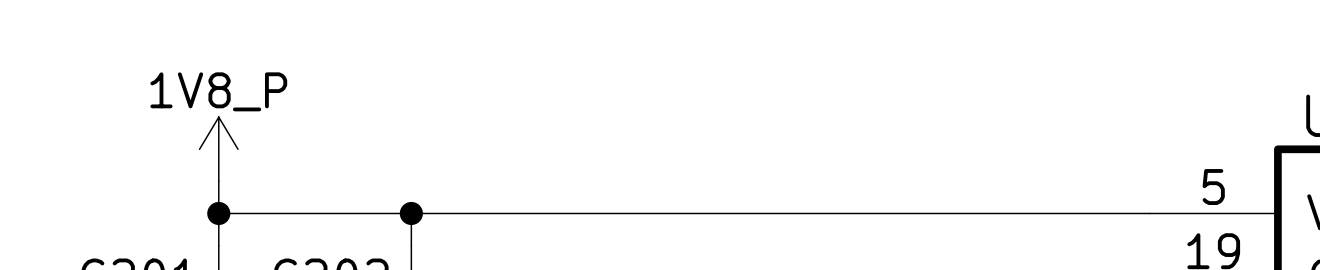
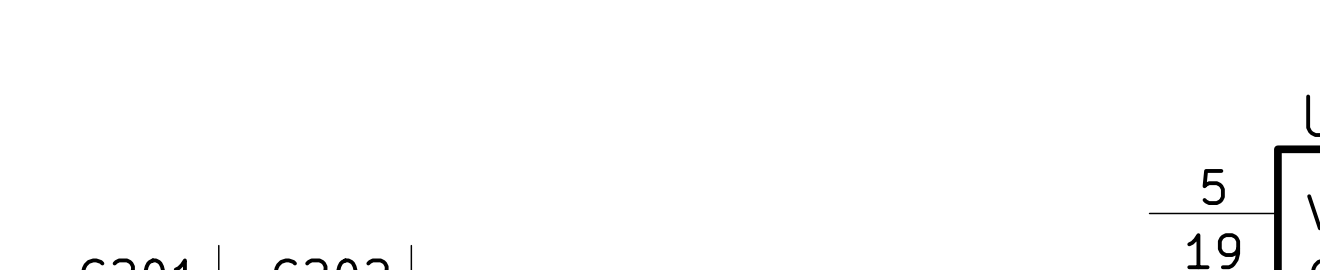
power symbol: 1V8_P (218, 149) -> none
wire: (218, 181) (218, 245) -> none
wire: (218, 213) (1149, 213) -> none
junction: (218, 213) -> none
wire: (411, 213) (411, 245) -> none
junction: (411, 213) -> none

